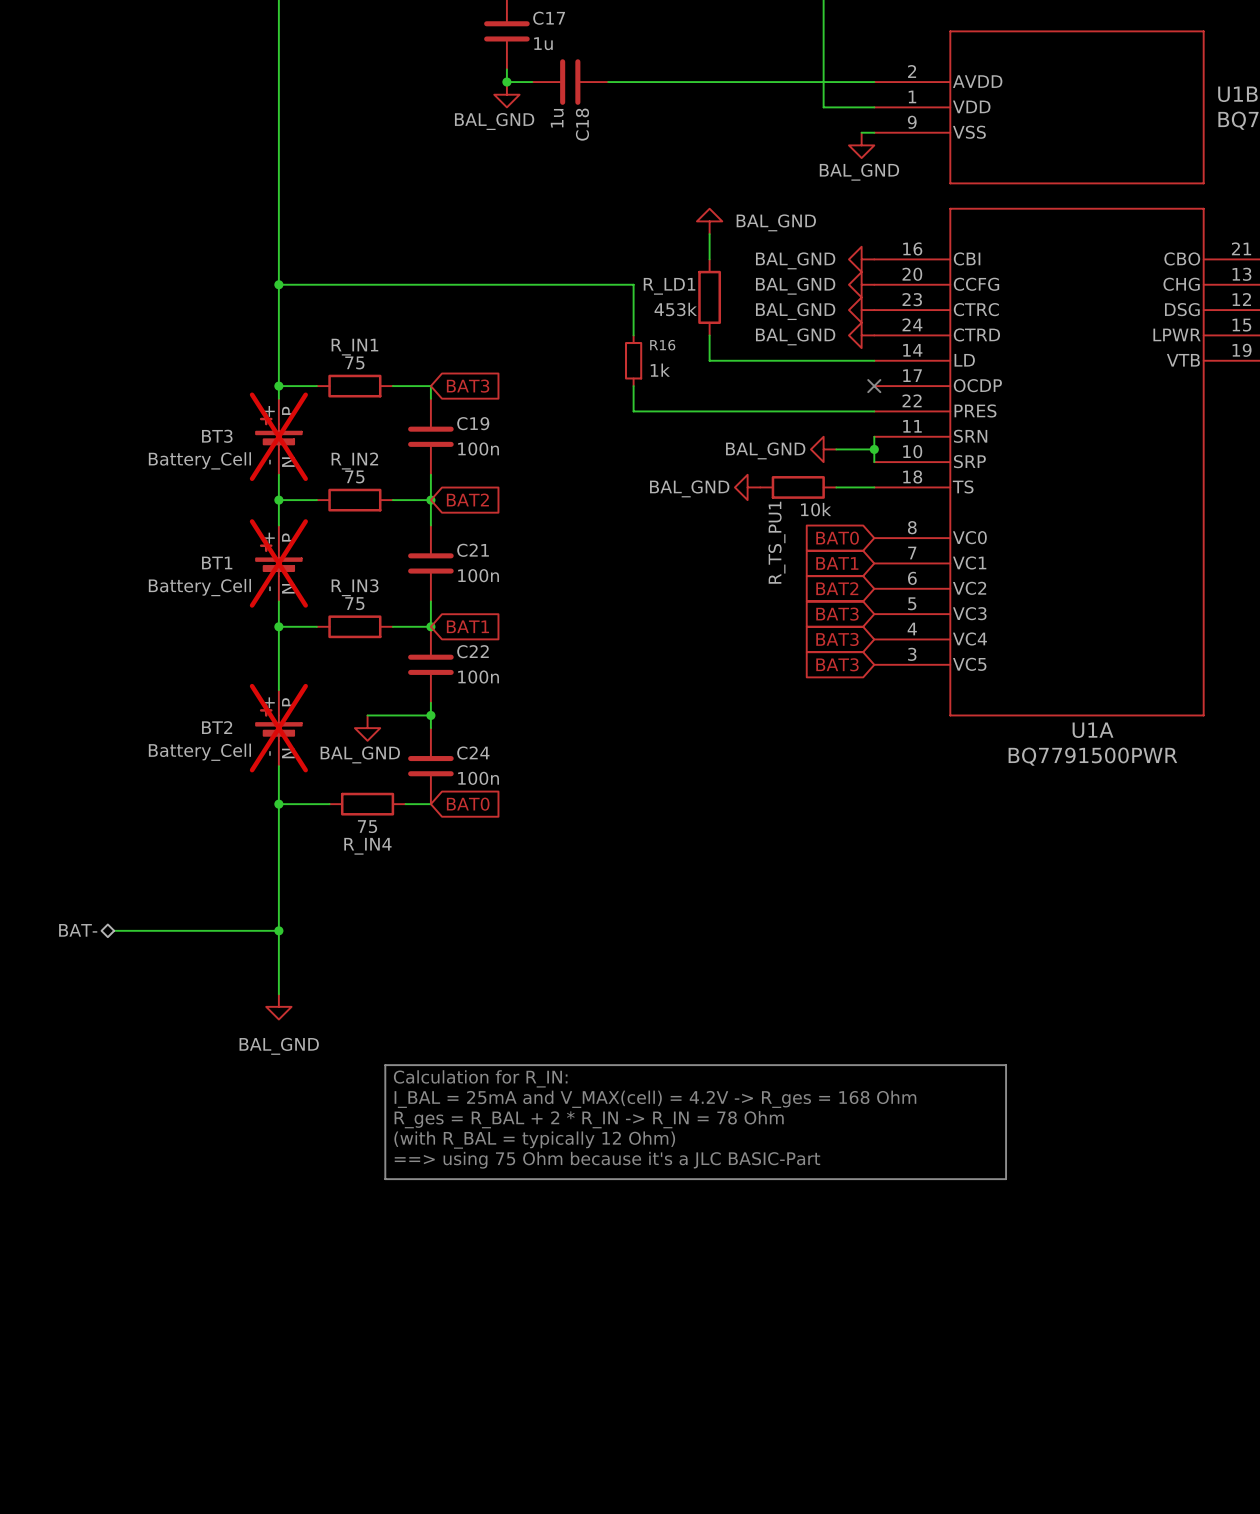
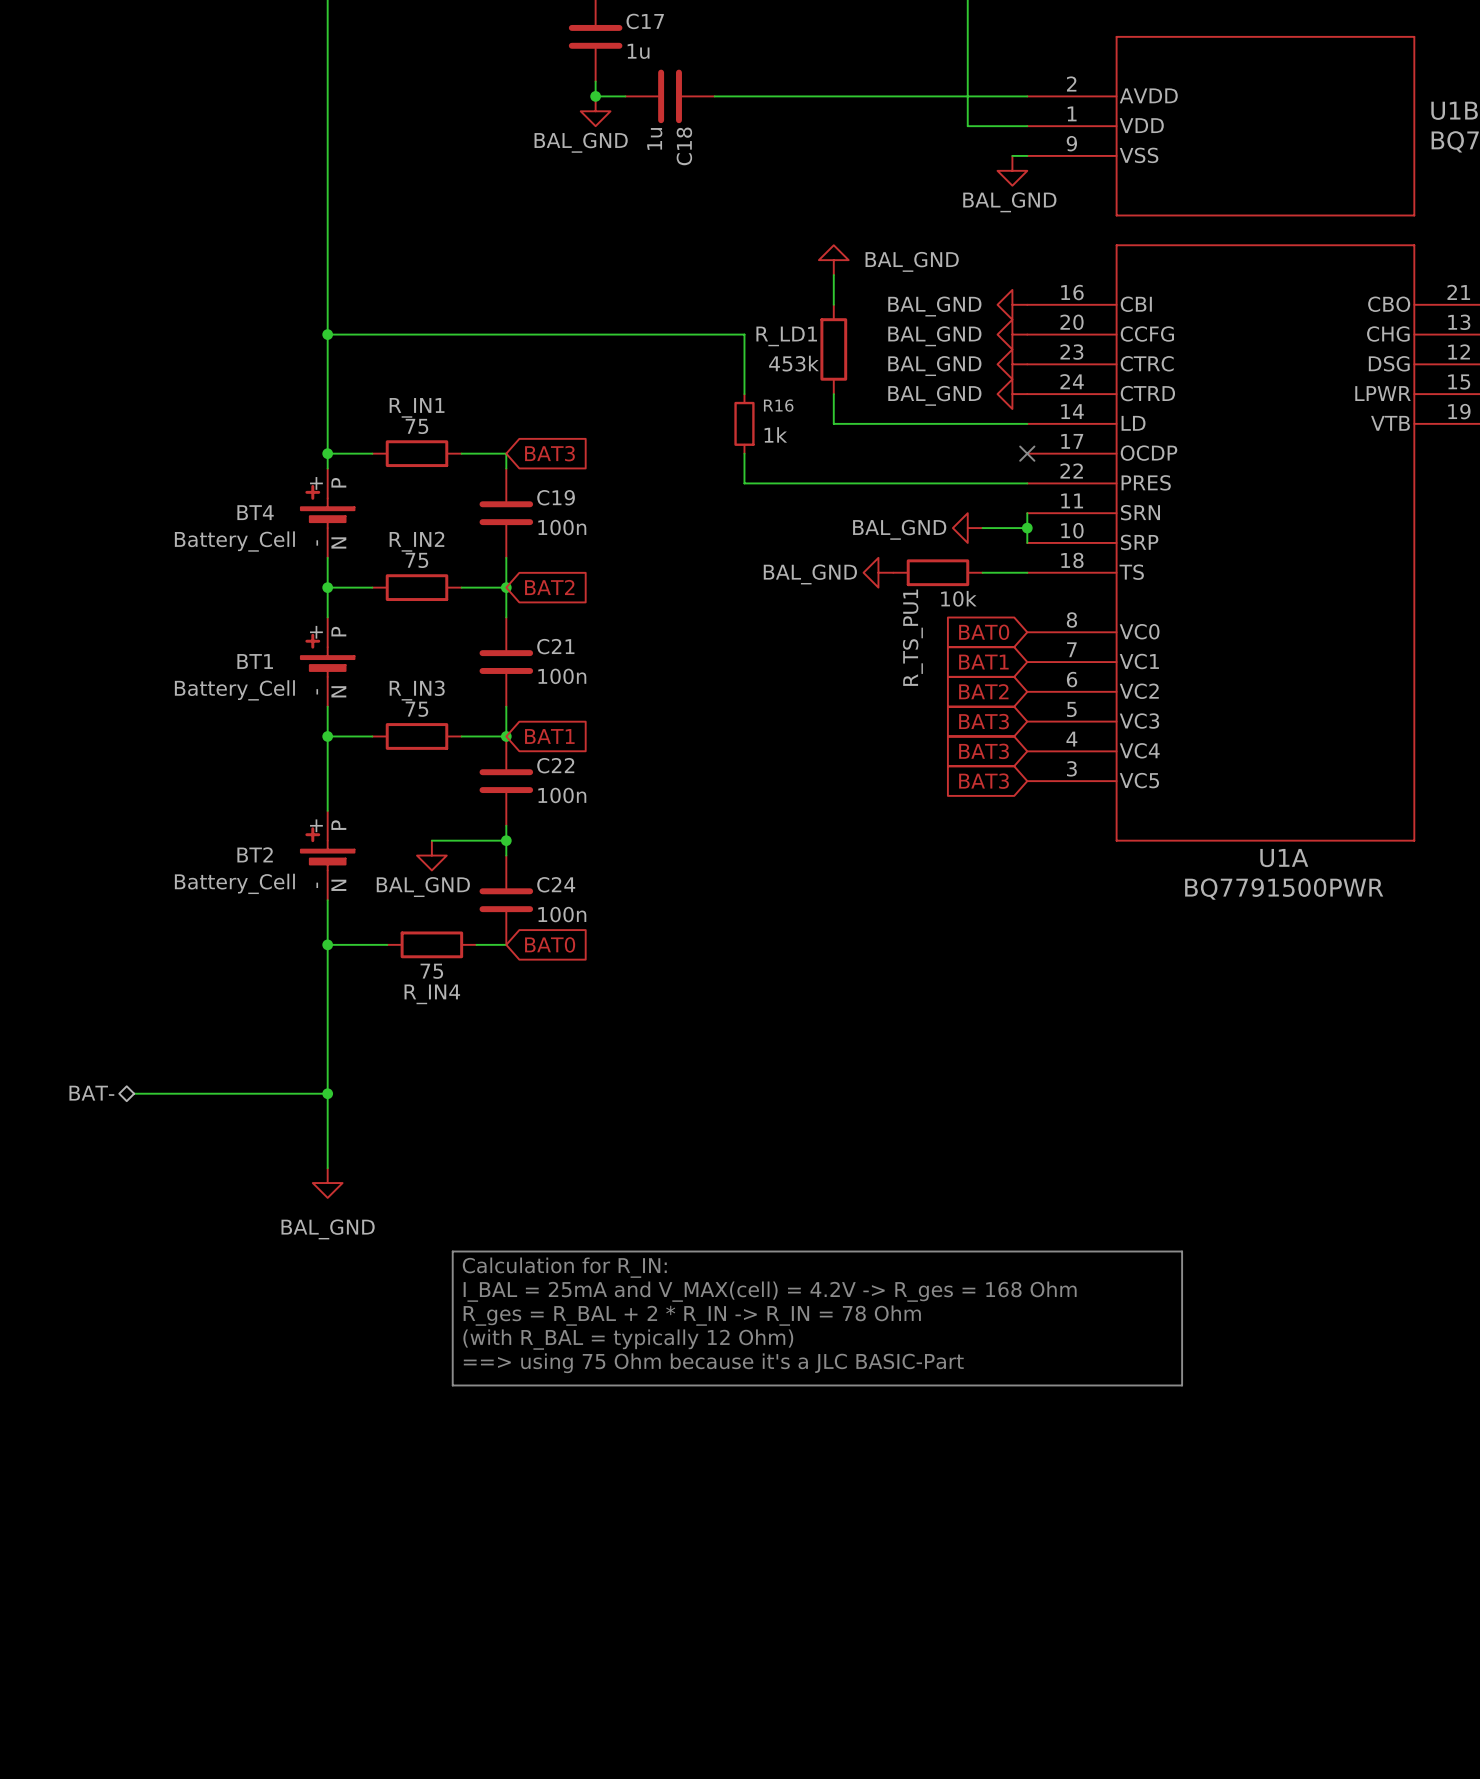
BT3 name: BT3 (217, 436) -> BT4 (255, 512)
BT3 do-not-place cross: (278, 436) -> none
BT1 do-not-place cross: (278, 563) -> none
BT2 do-not-place cross: (278, 728) -> none

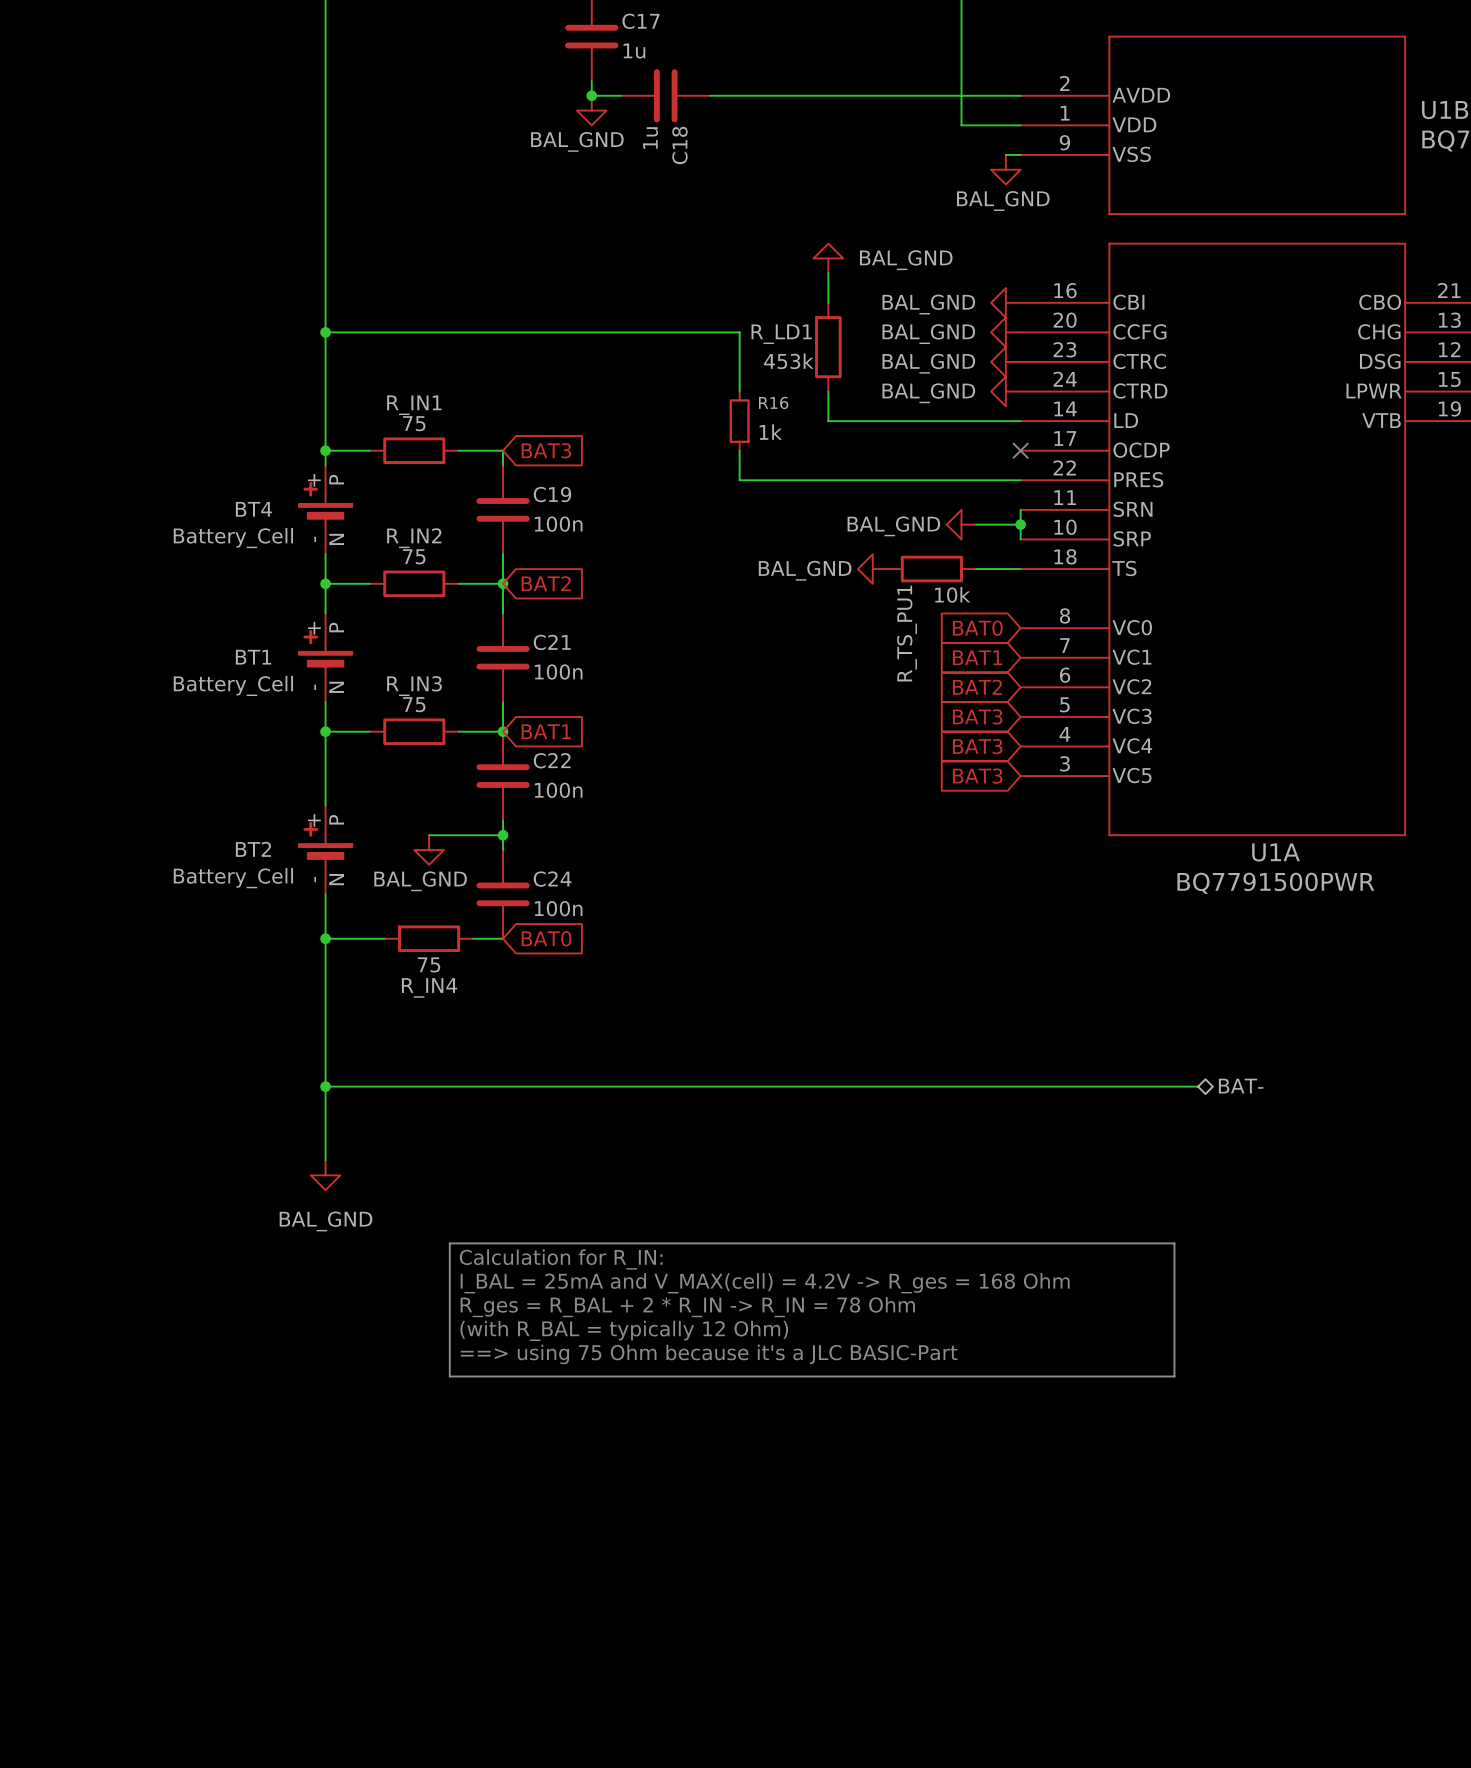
hierarchical label: BAT- (91, 1093) -> none
wire: (134, 1093) (327, 1093) -> (1198, 1086) (325, 1086)
hierarchical label: none -> BAT- (1241, 1086)

